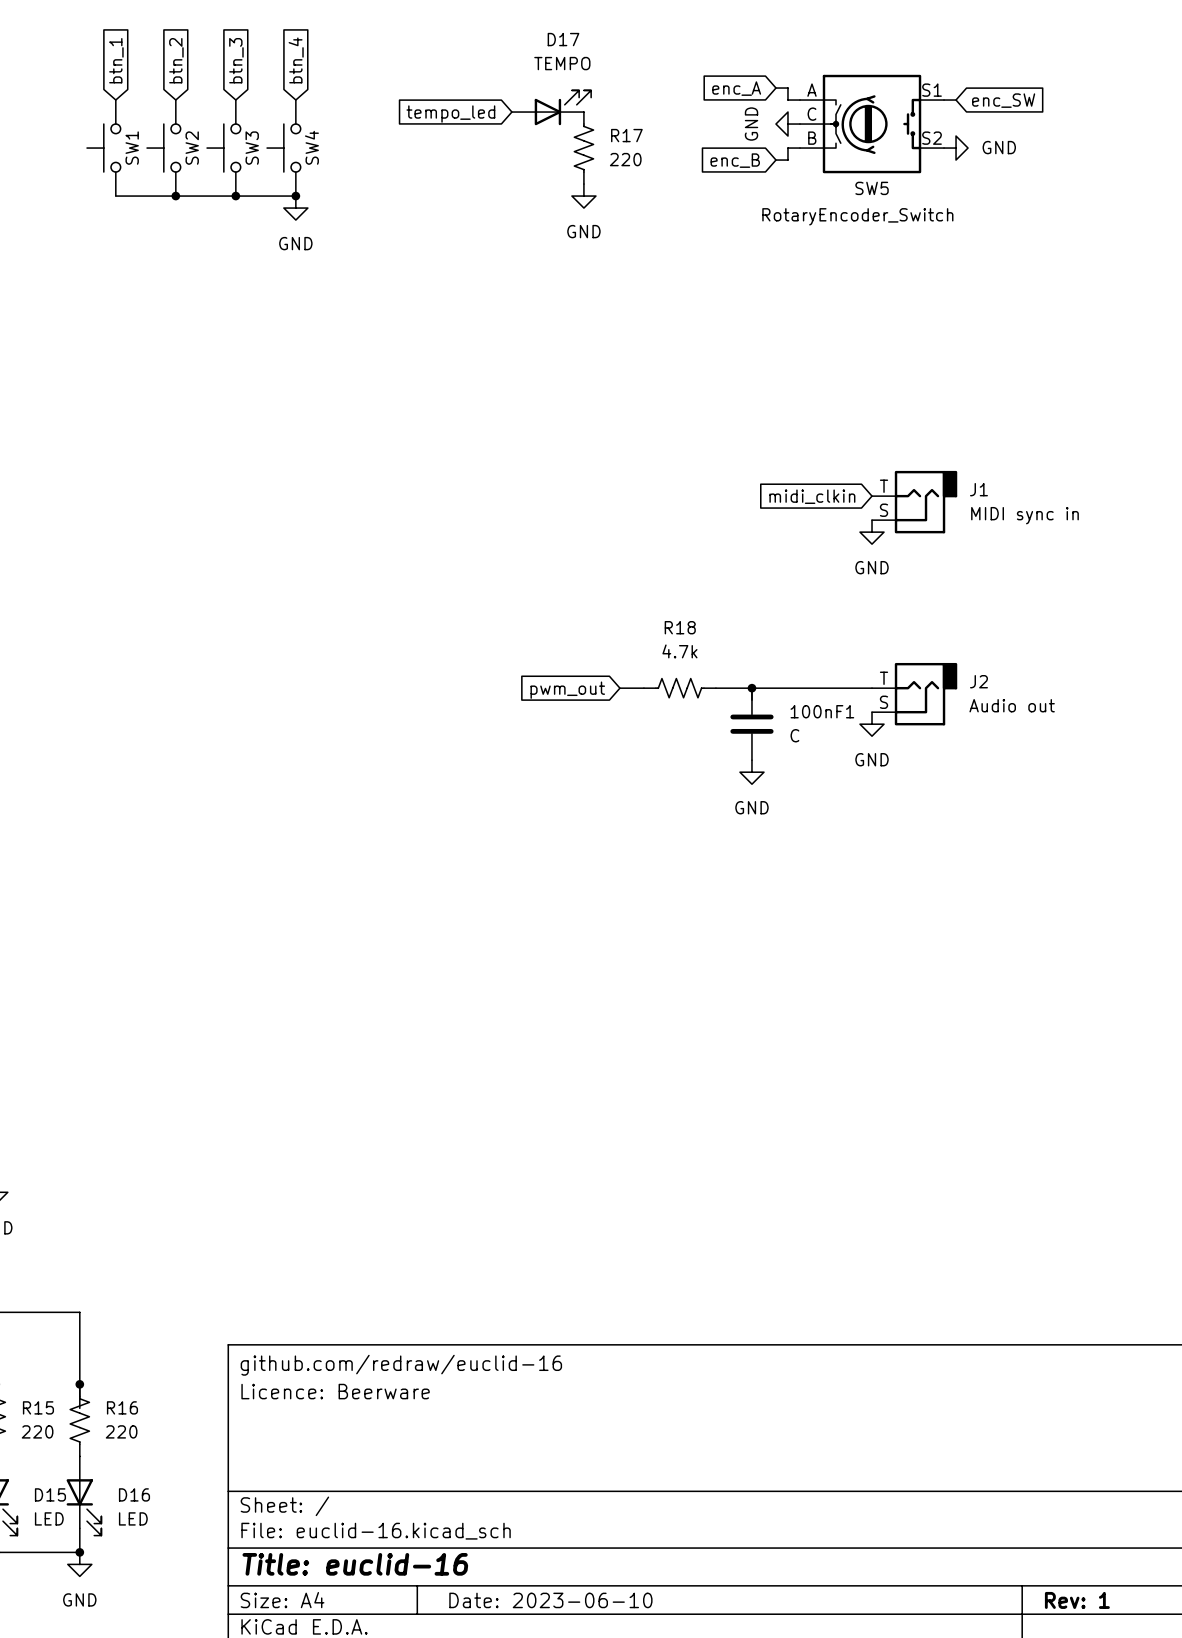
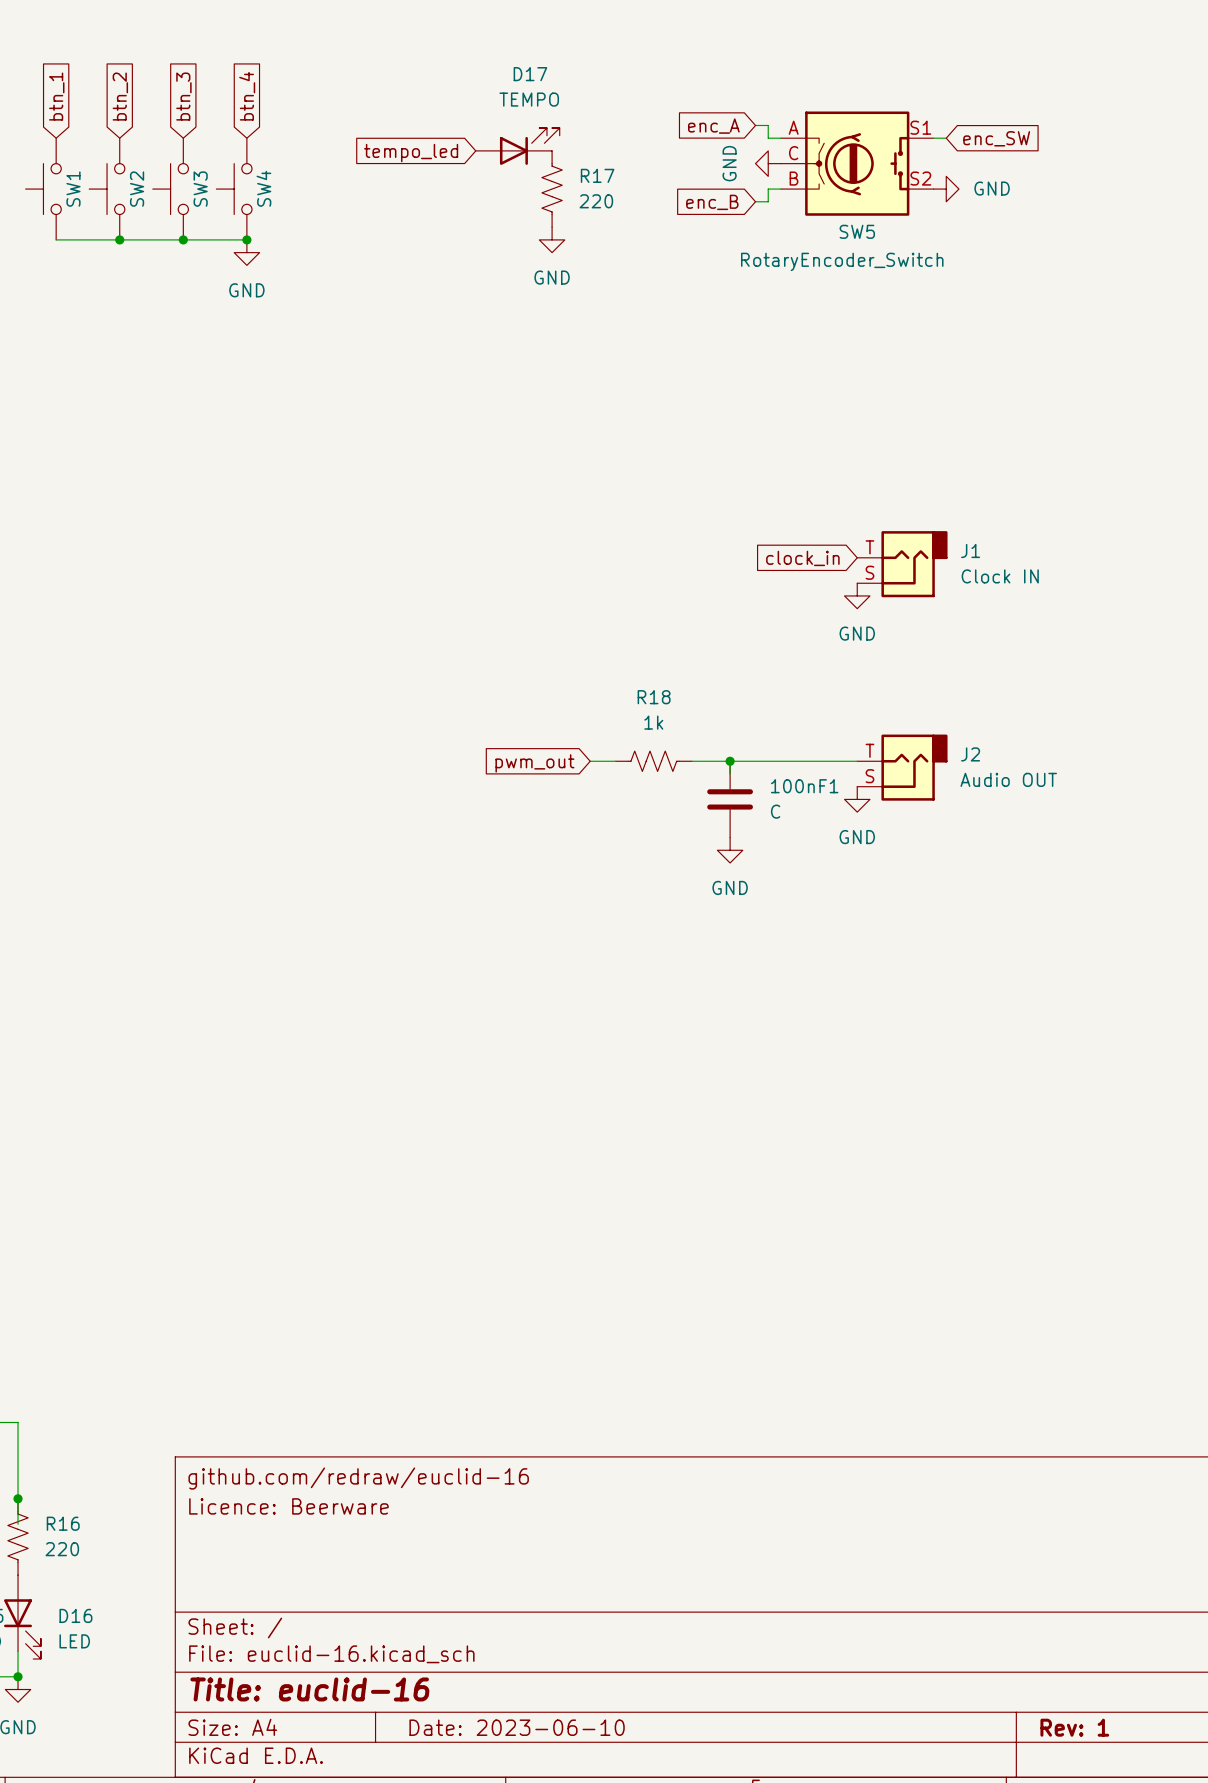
global label: midi_clkin (812, 496) -> clock_in (802, 558)
J1 value: MIDI sync in (1024, 515) -> Clock IN (1000, 576)
R18 value: 4.7k (679, 651) -> 1k (653, 722)
J2 value: Audio out (1012, 705) -> Audio OUT (1008, 779)

